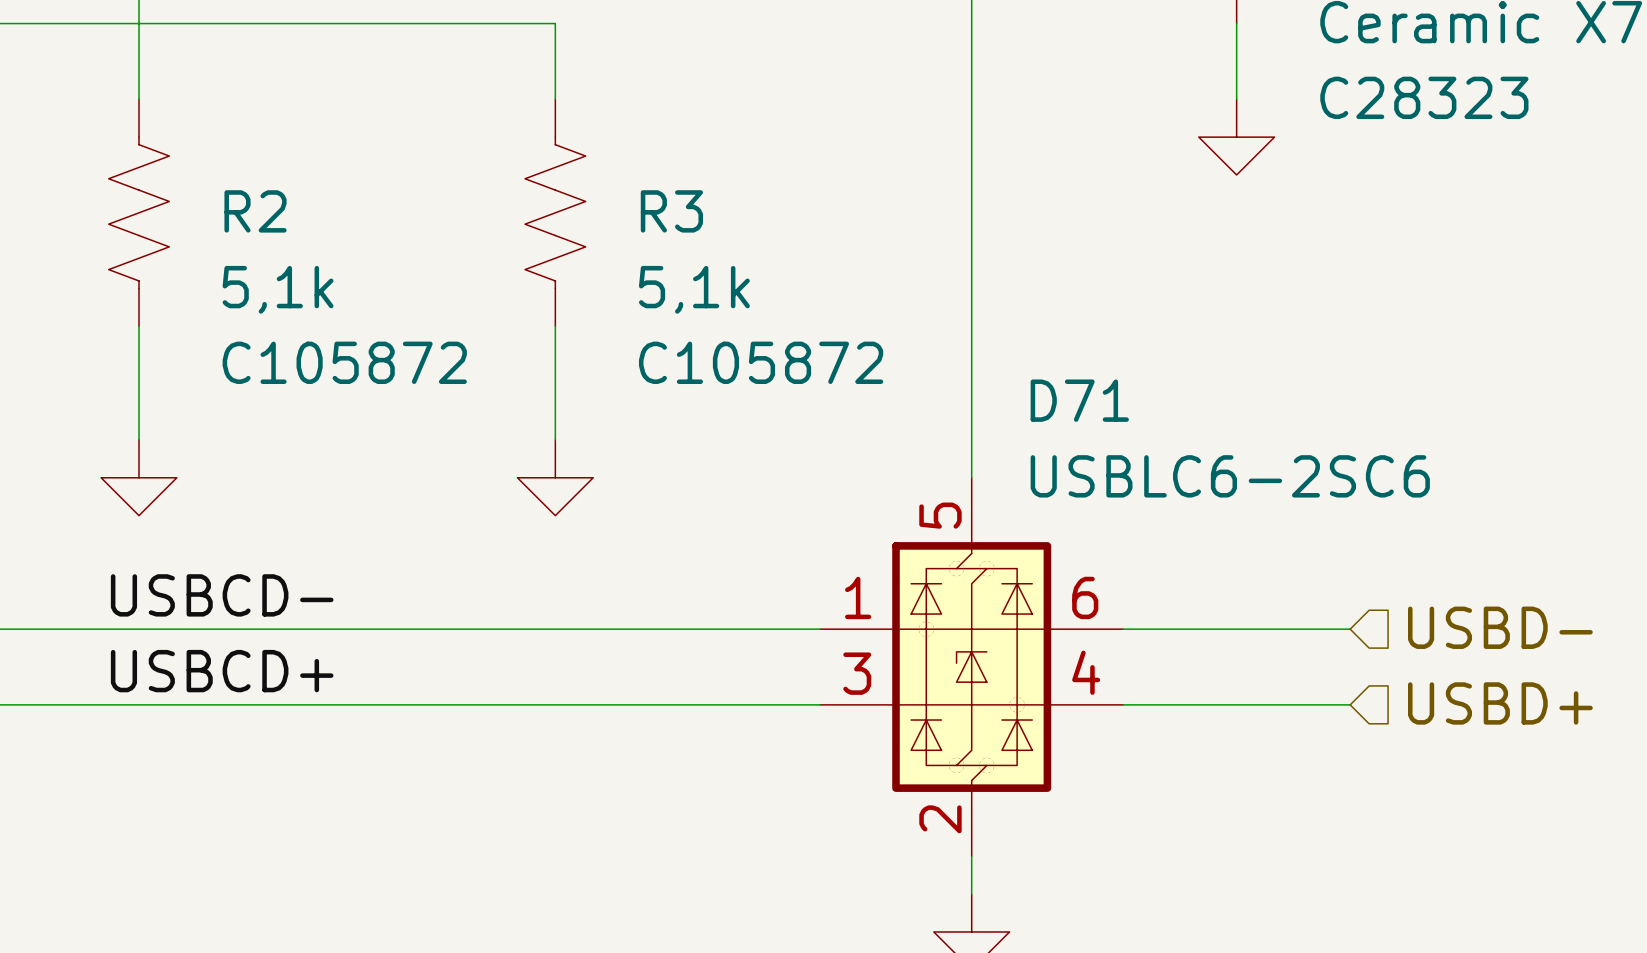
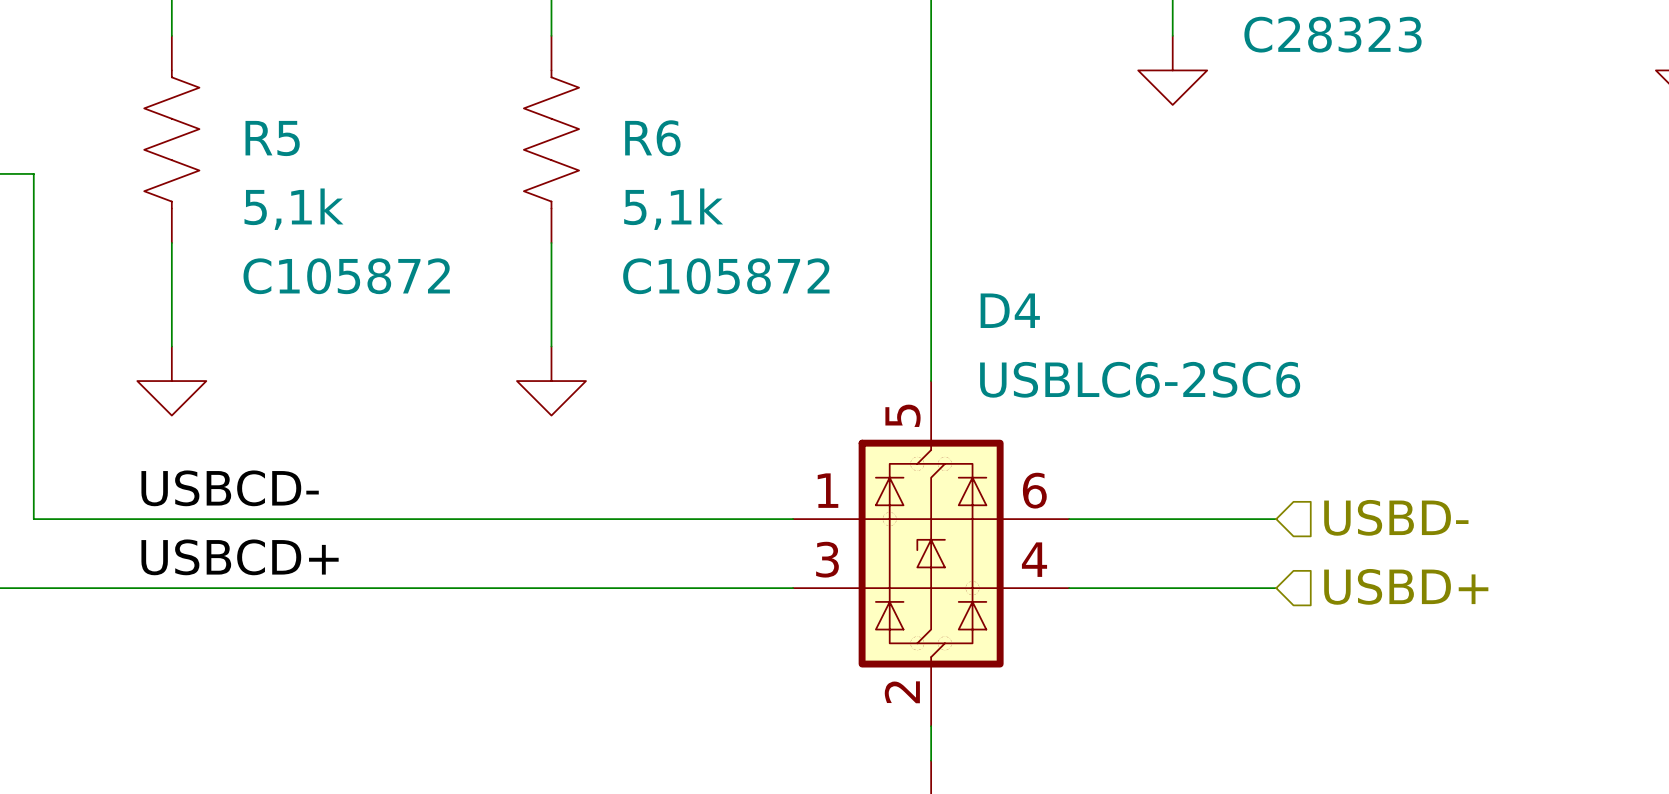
R2 name: R2 (255, 211) -> R5 (272, 138)
R3 name: R3 (671, 211) -> R6 (652, 138)
D71 name: D71 (1079, 400) -> D4 (1010, 310)

